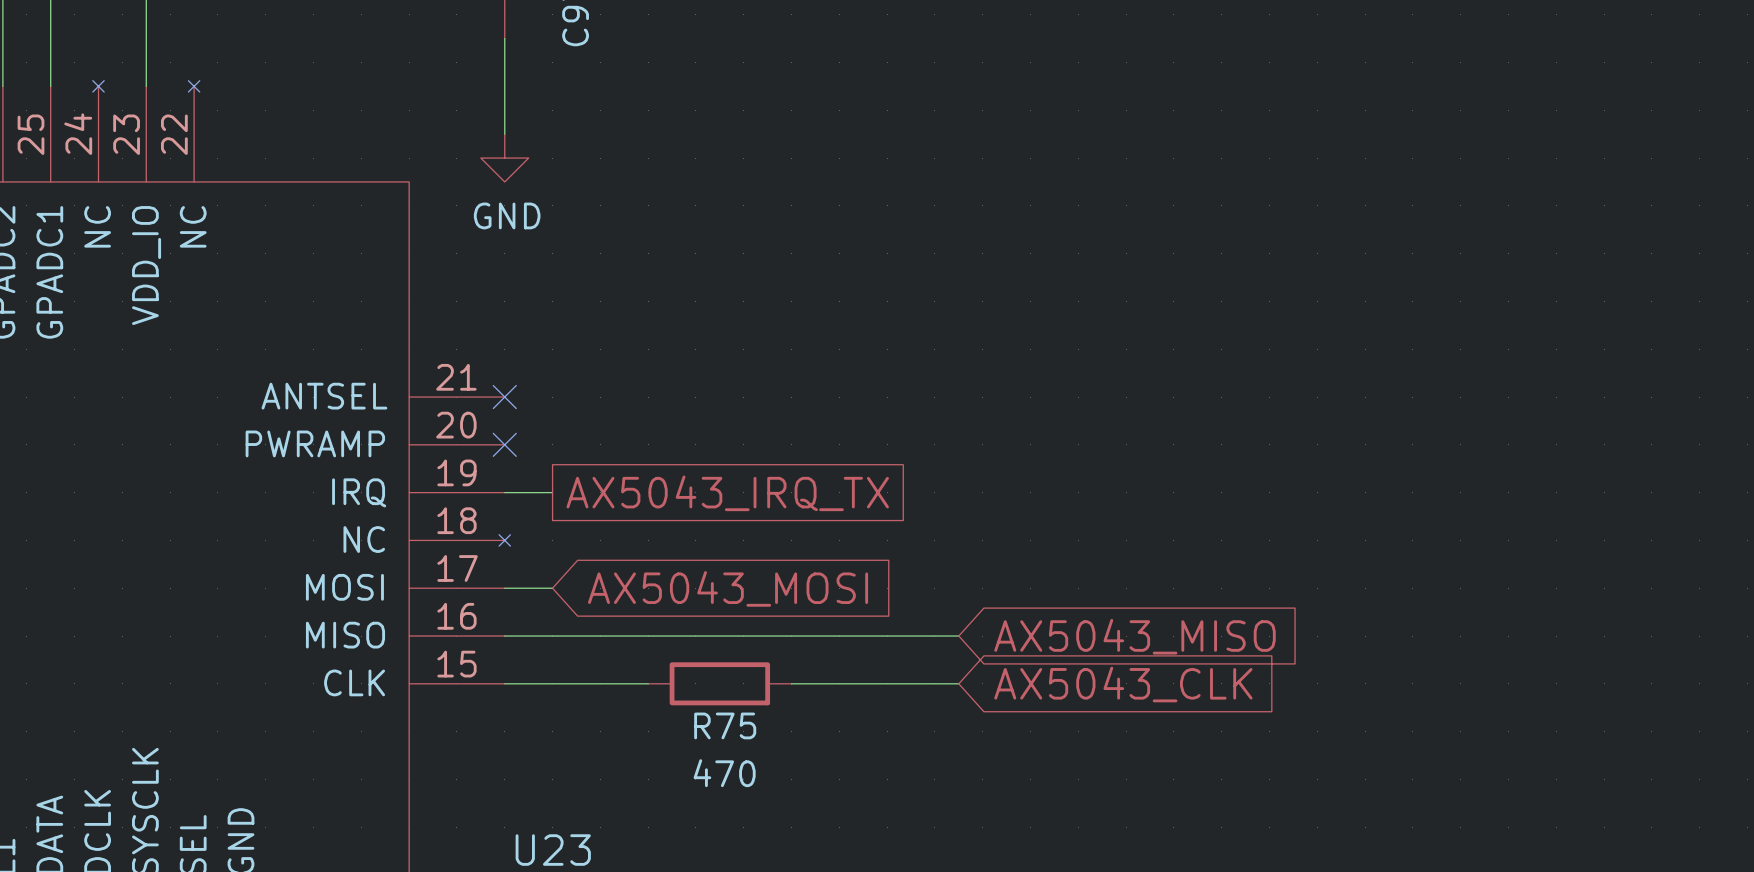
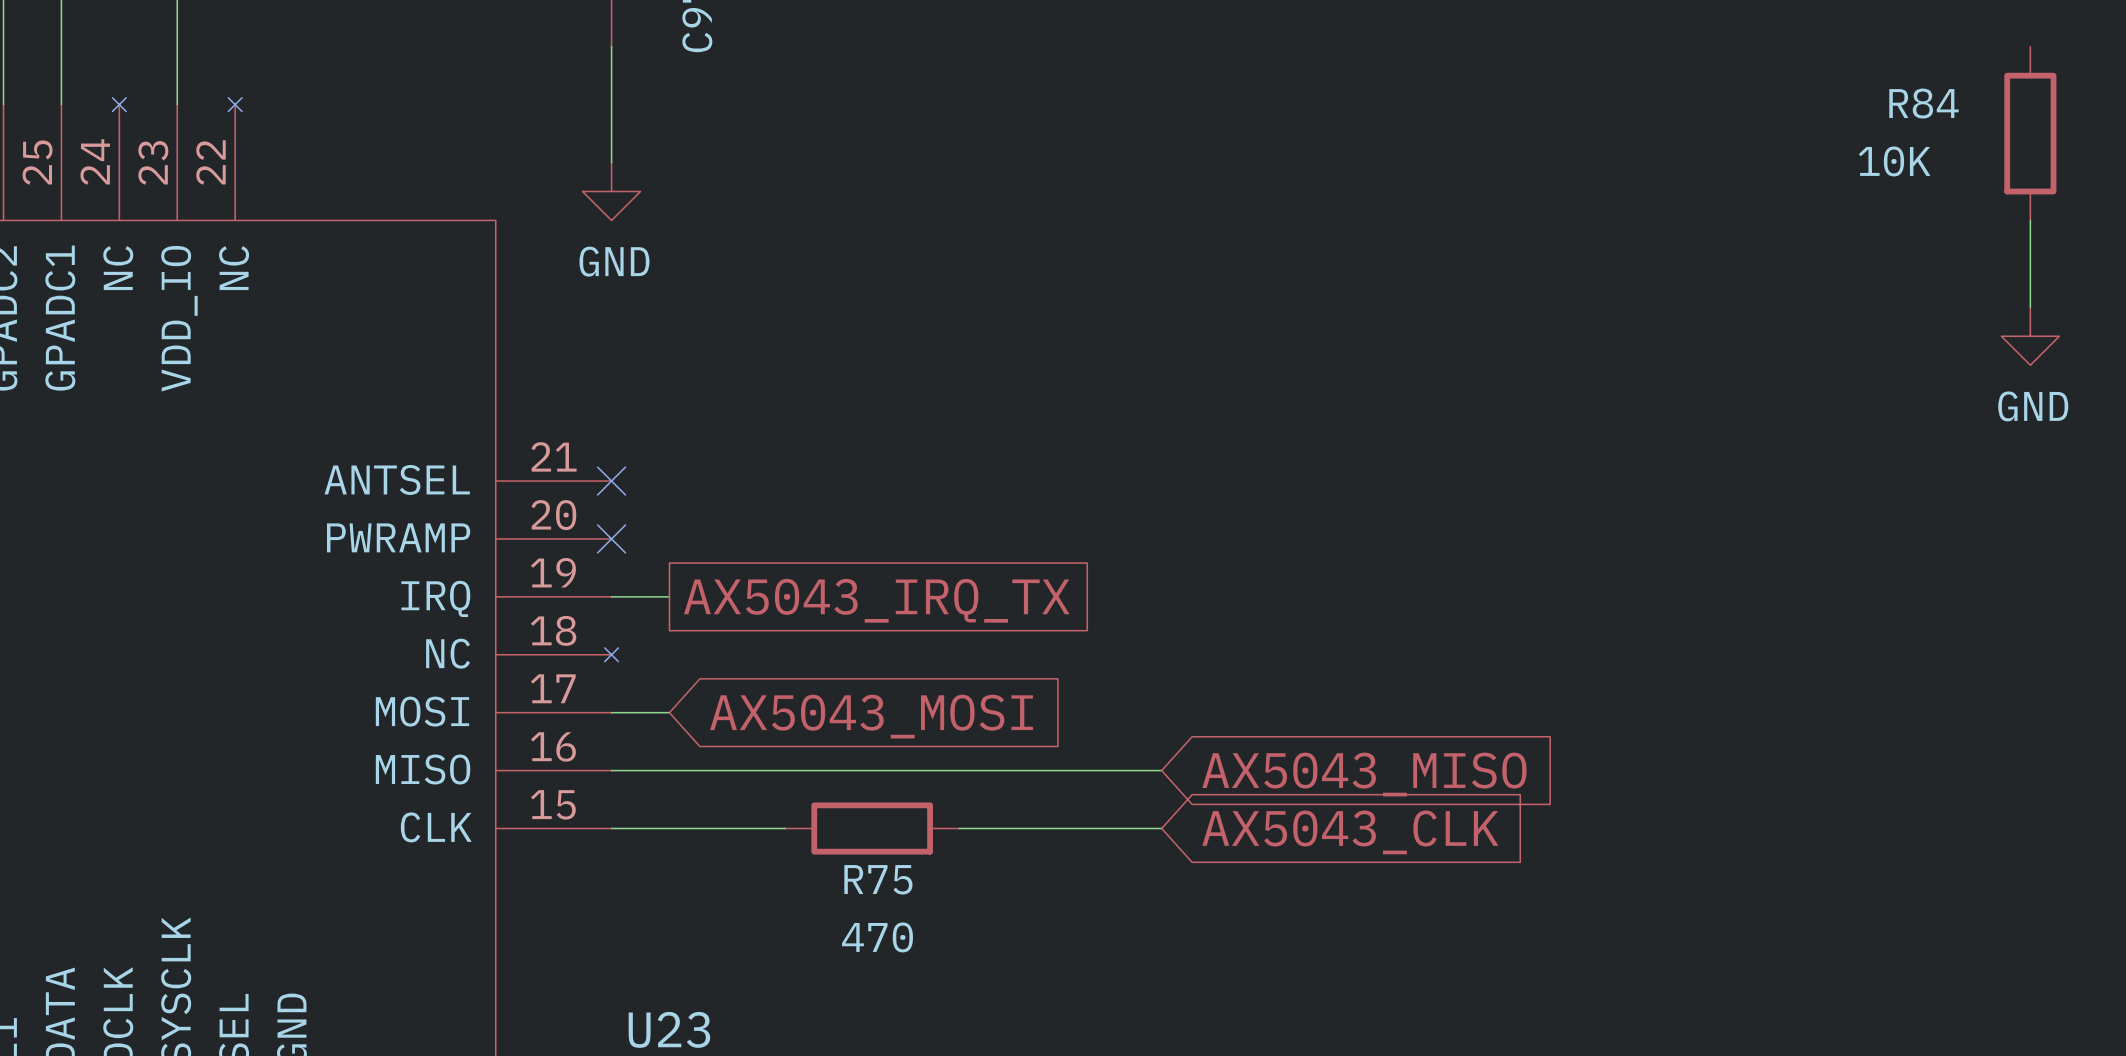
R84: none -> 10K (2030, 133)
wire: none -> (2030, 220) (2030, 307)
power symbol: none -> GND (2030, 336)

